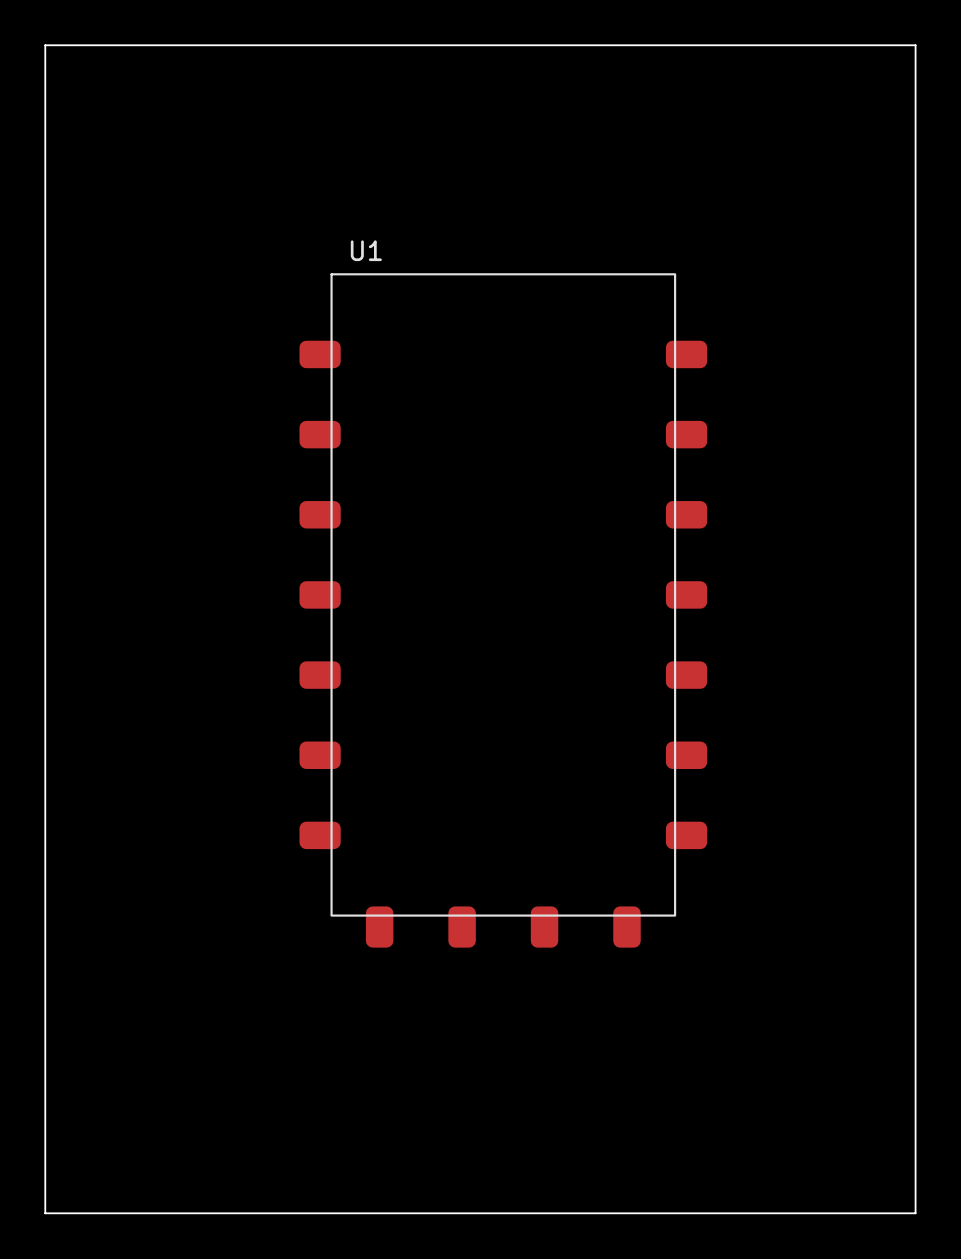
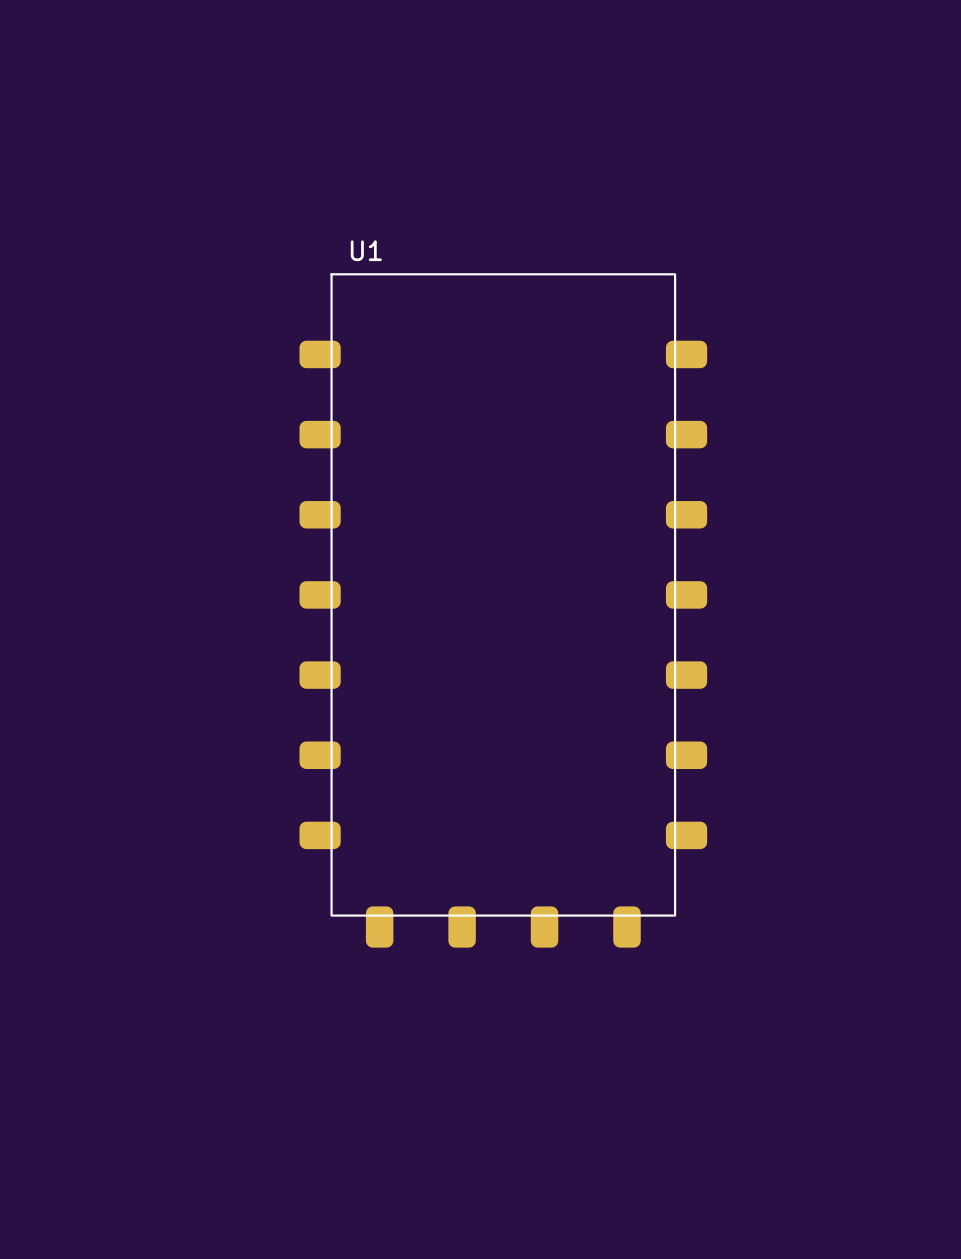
board edge: (45, 45) (915, 45) (915, 1213) (45, 1213) (45, 45) -> none

